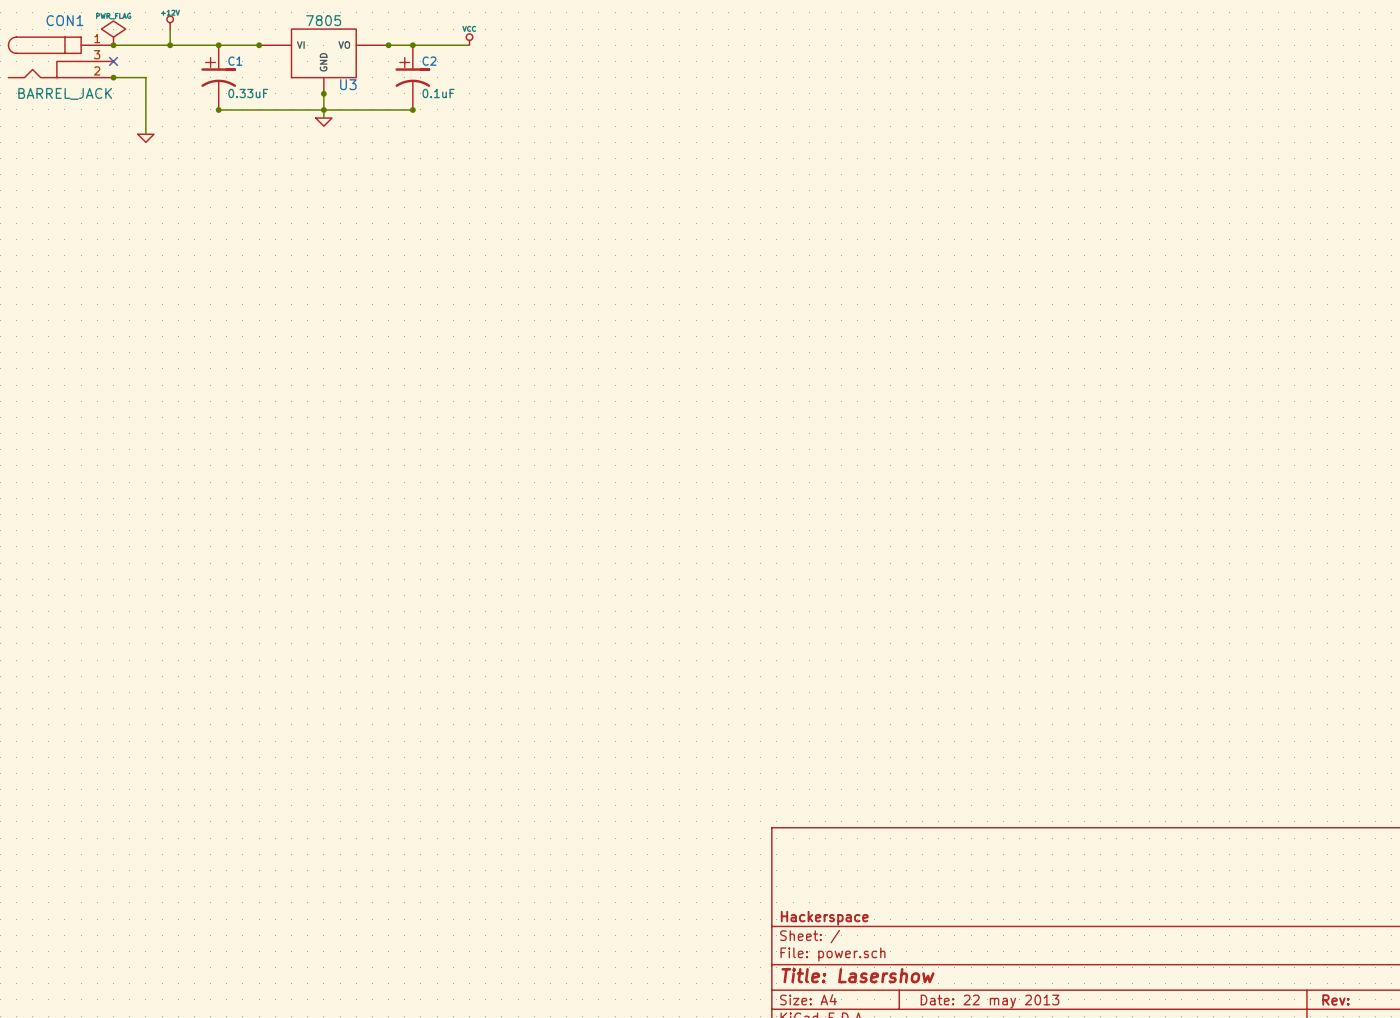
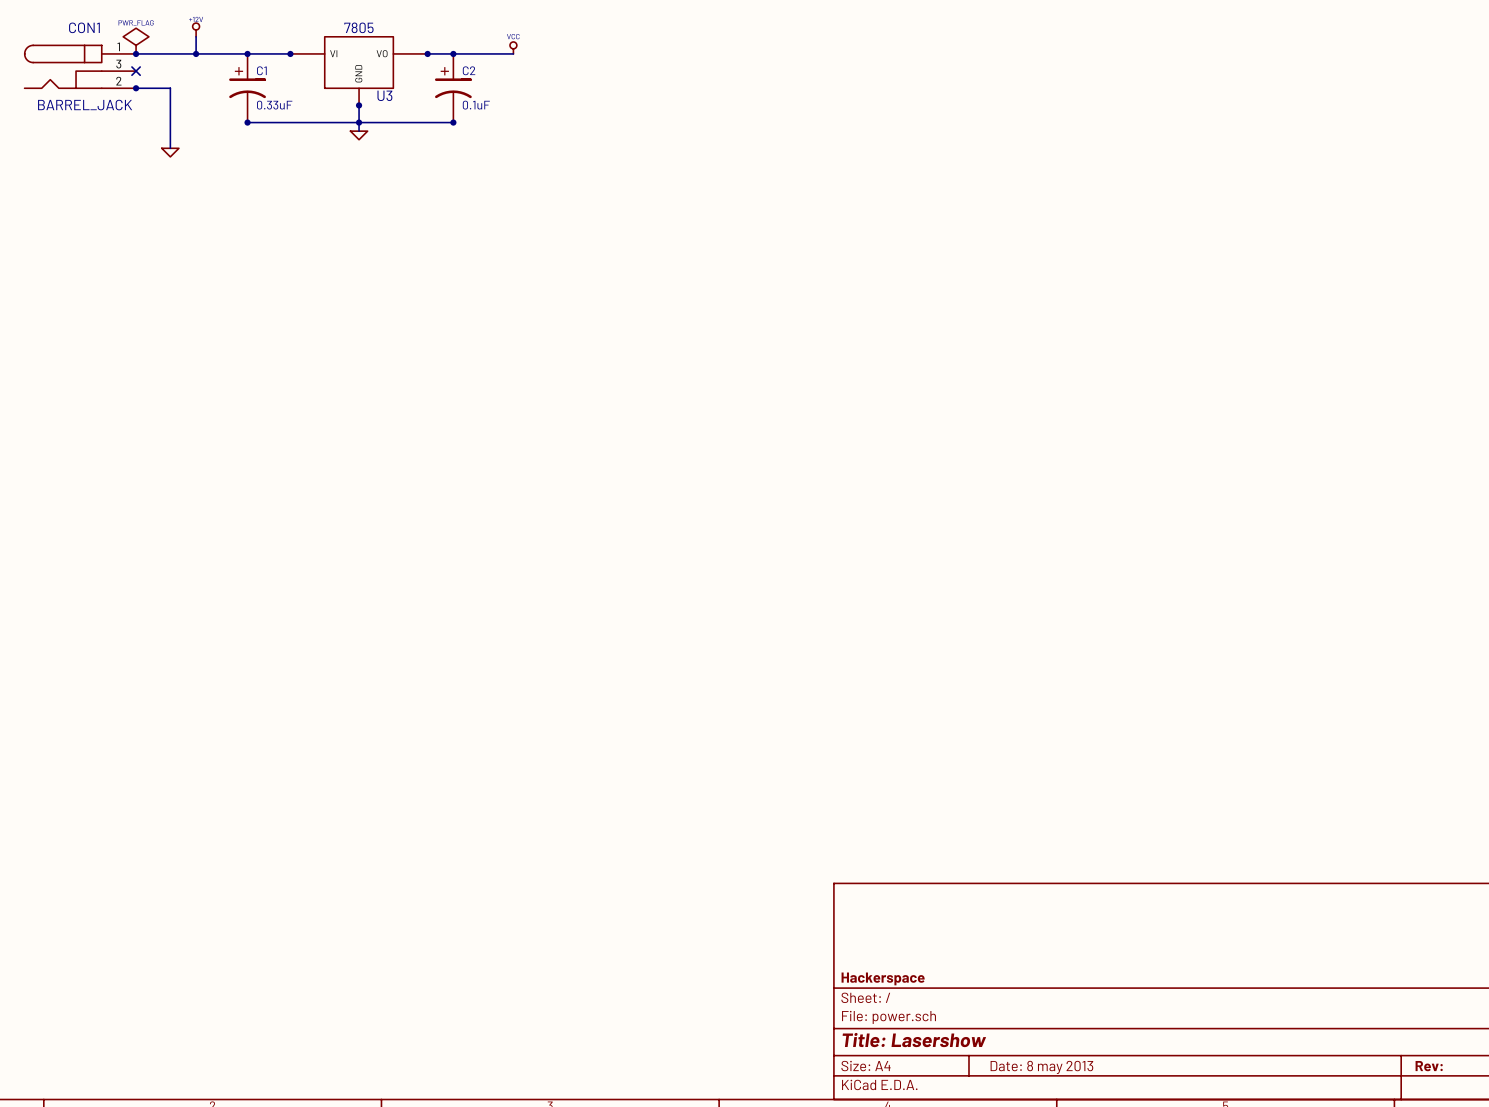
title block: Date: 22 may 2013 (989, 1001) -> Date: 8 may 2013 (1041, 1067)

